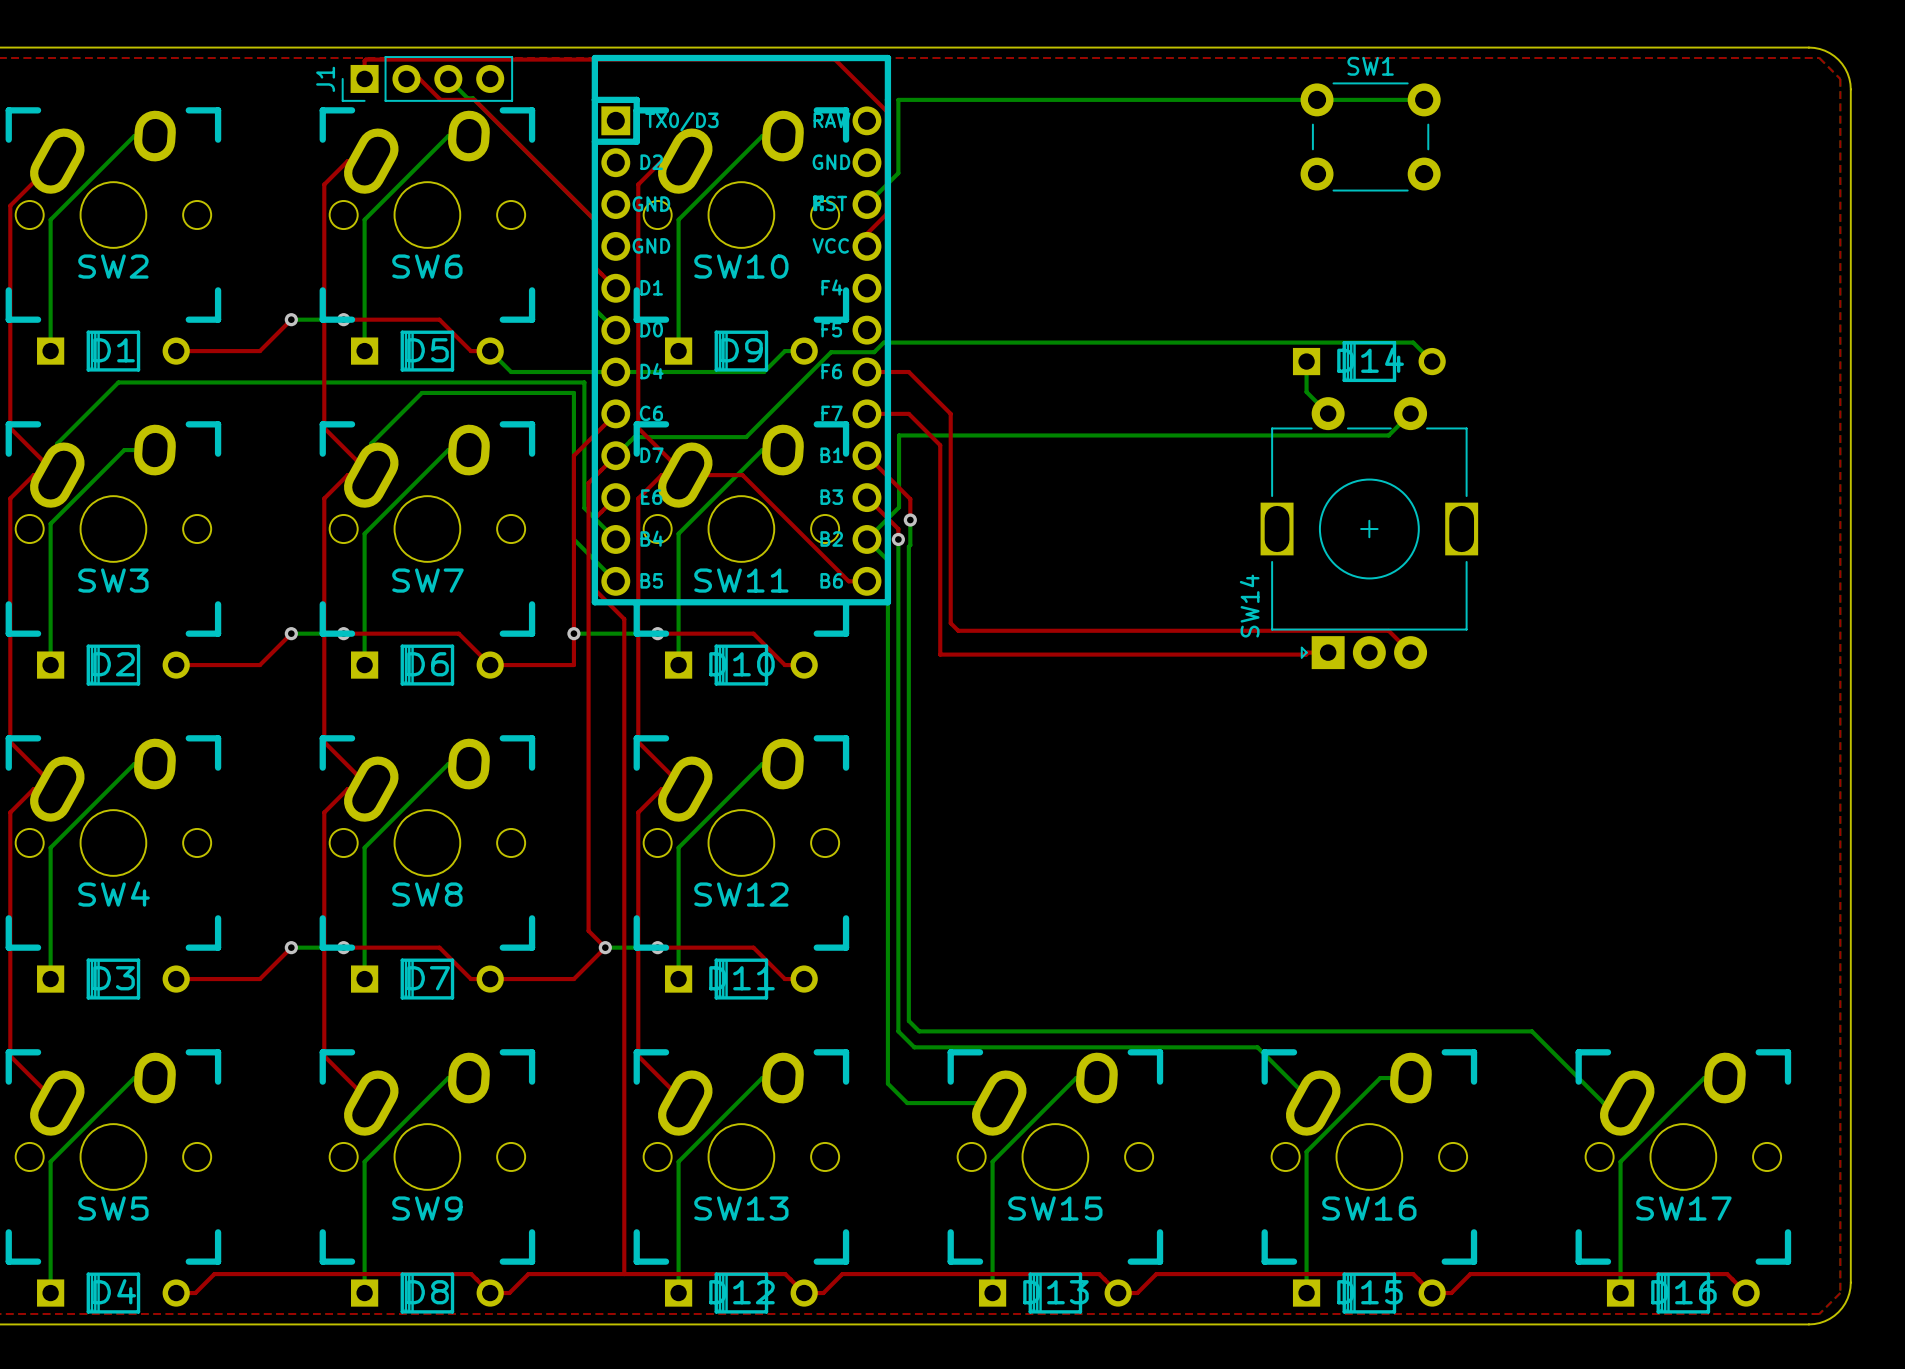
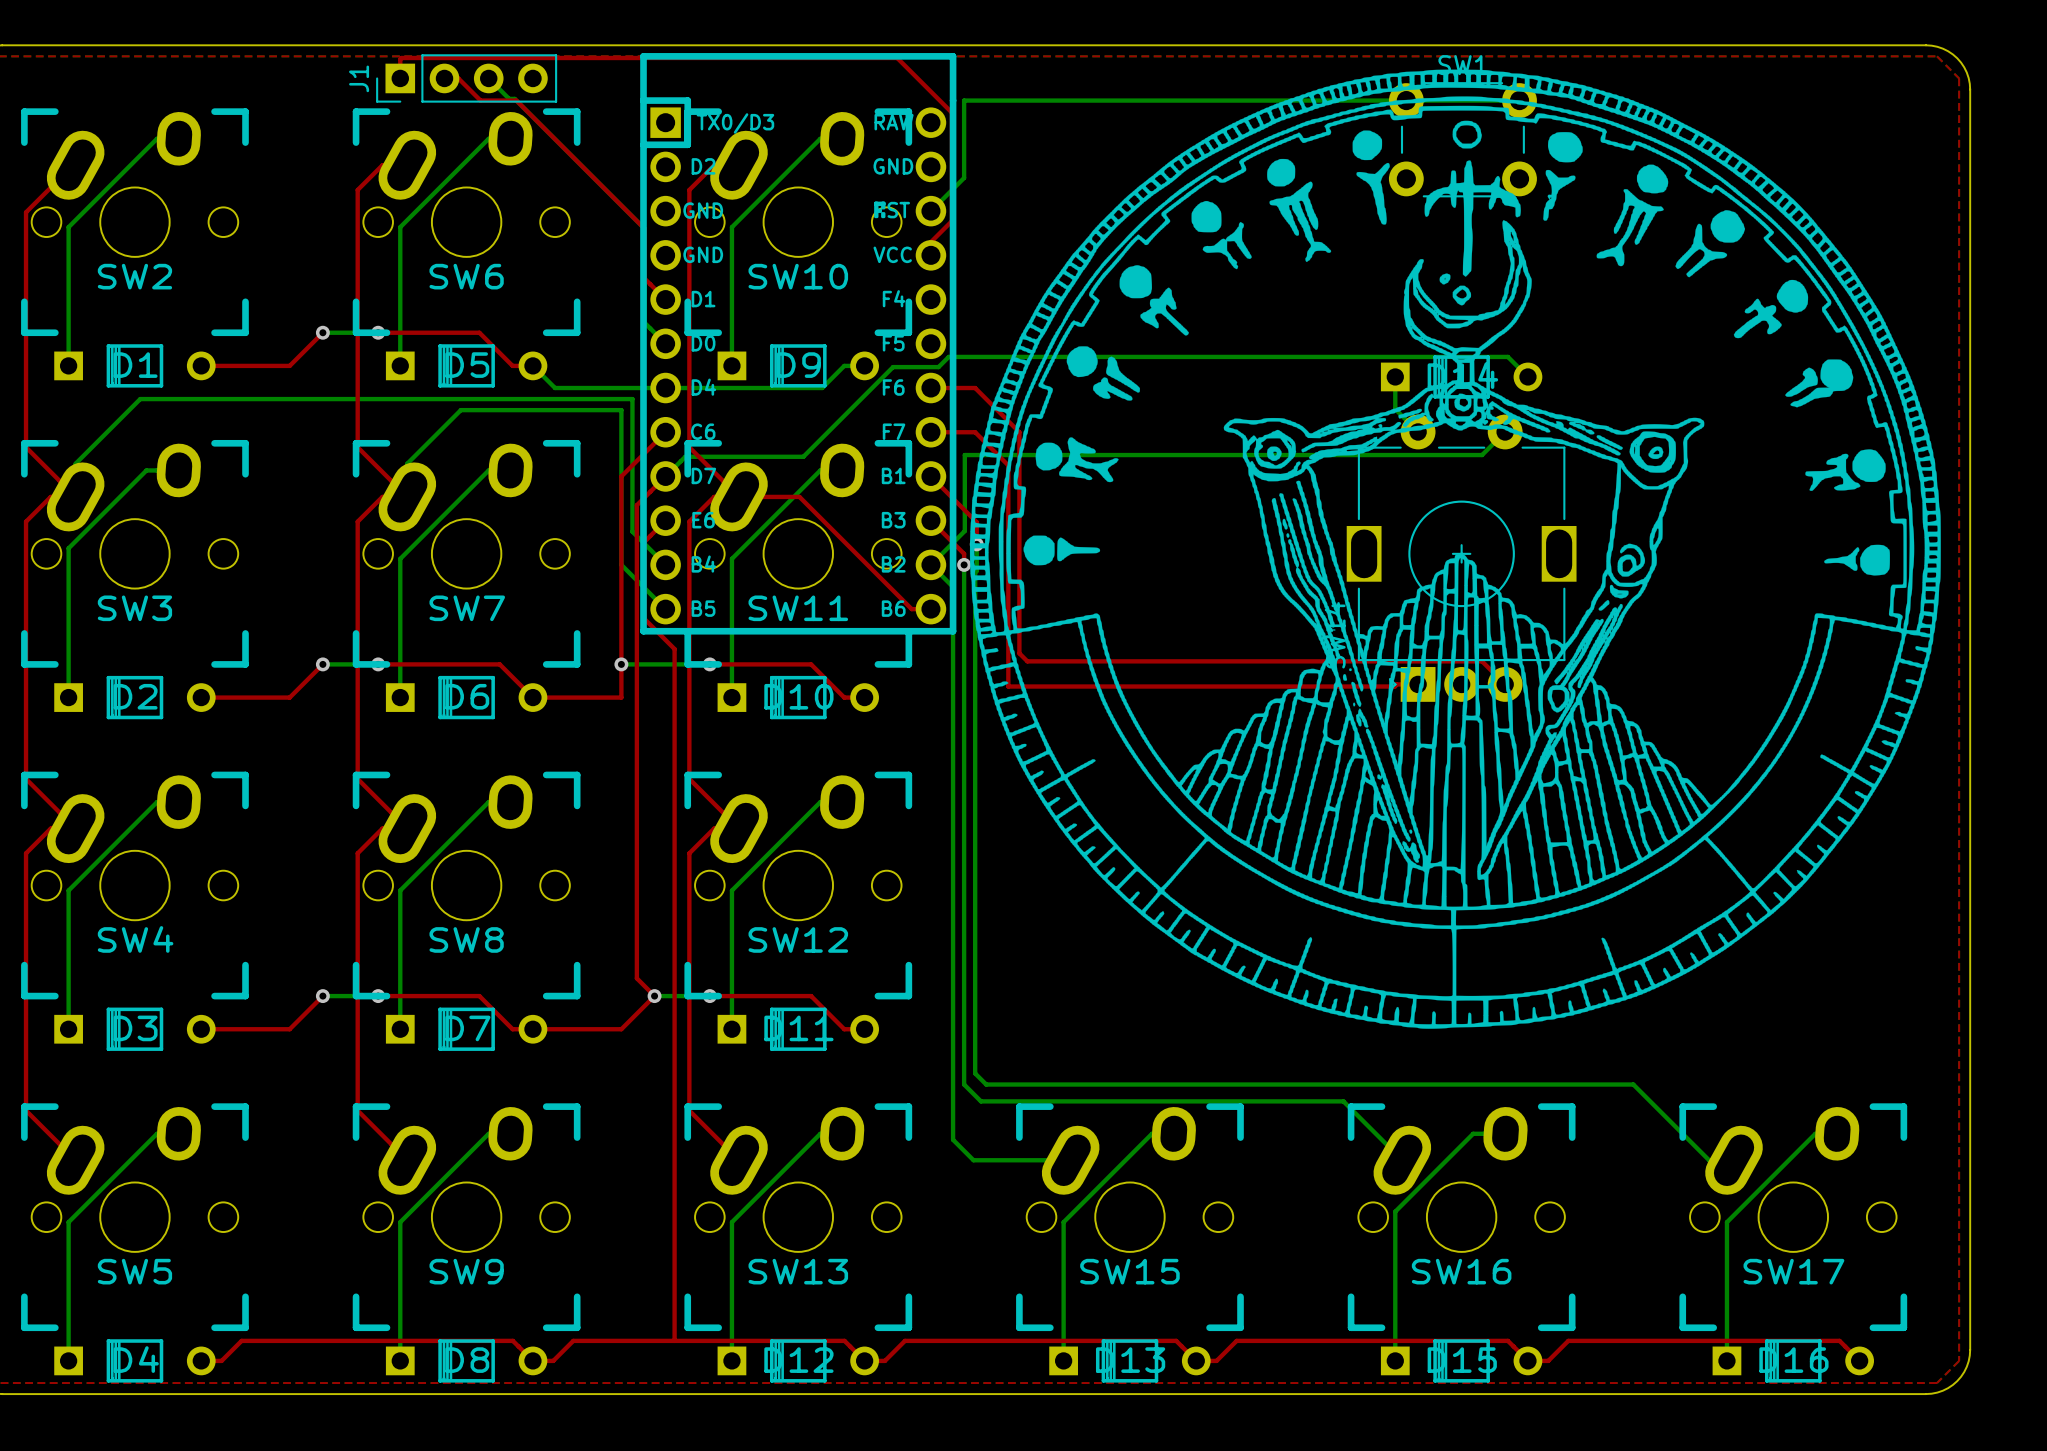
drawing: none -> [969, 69, 1941, 1029]

